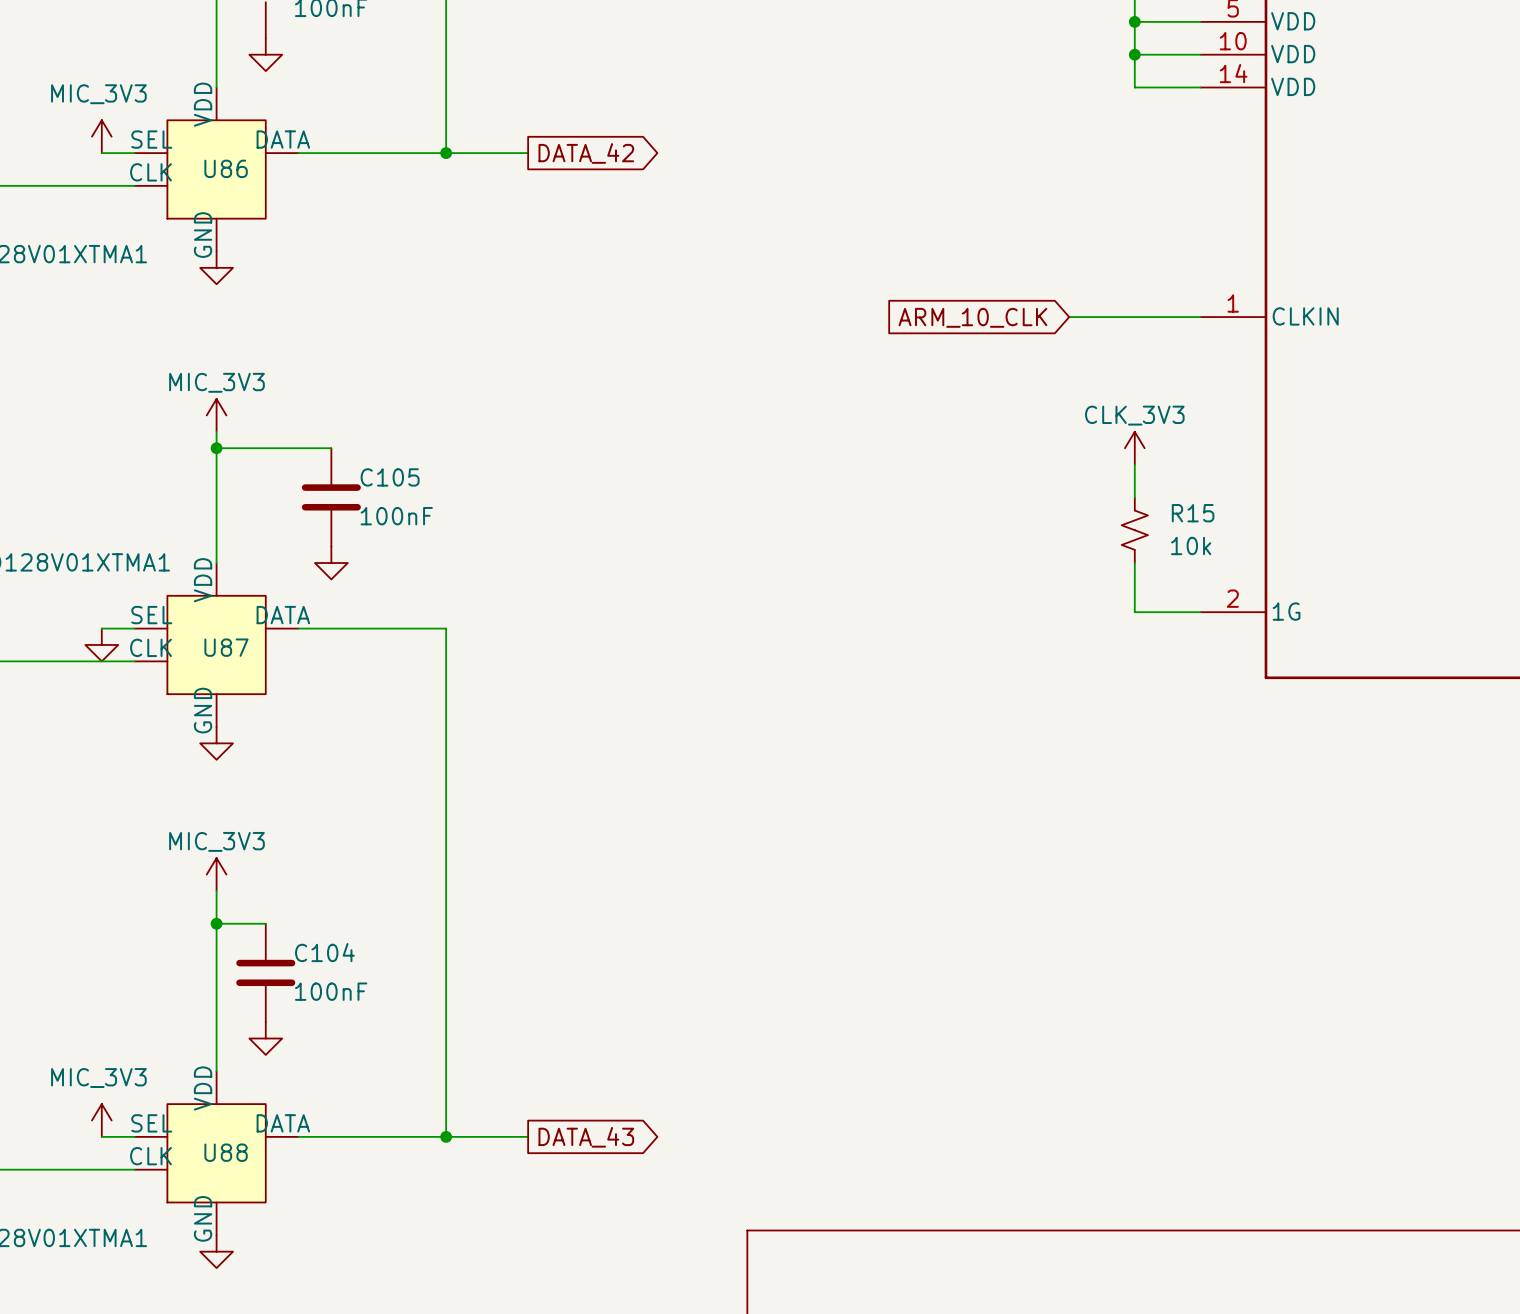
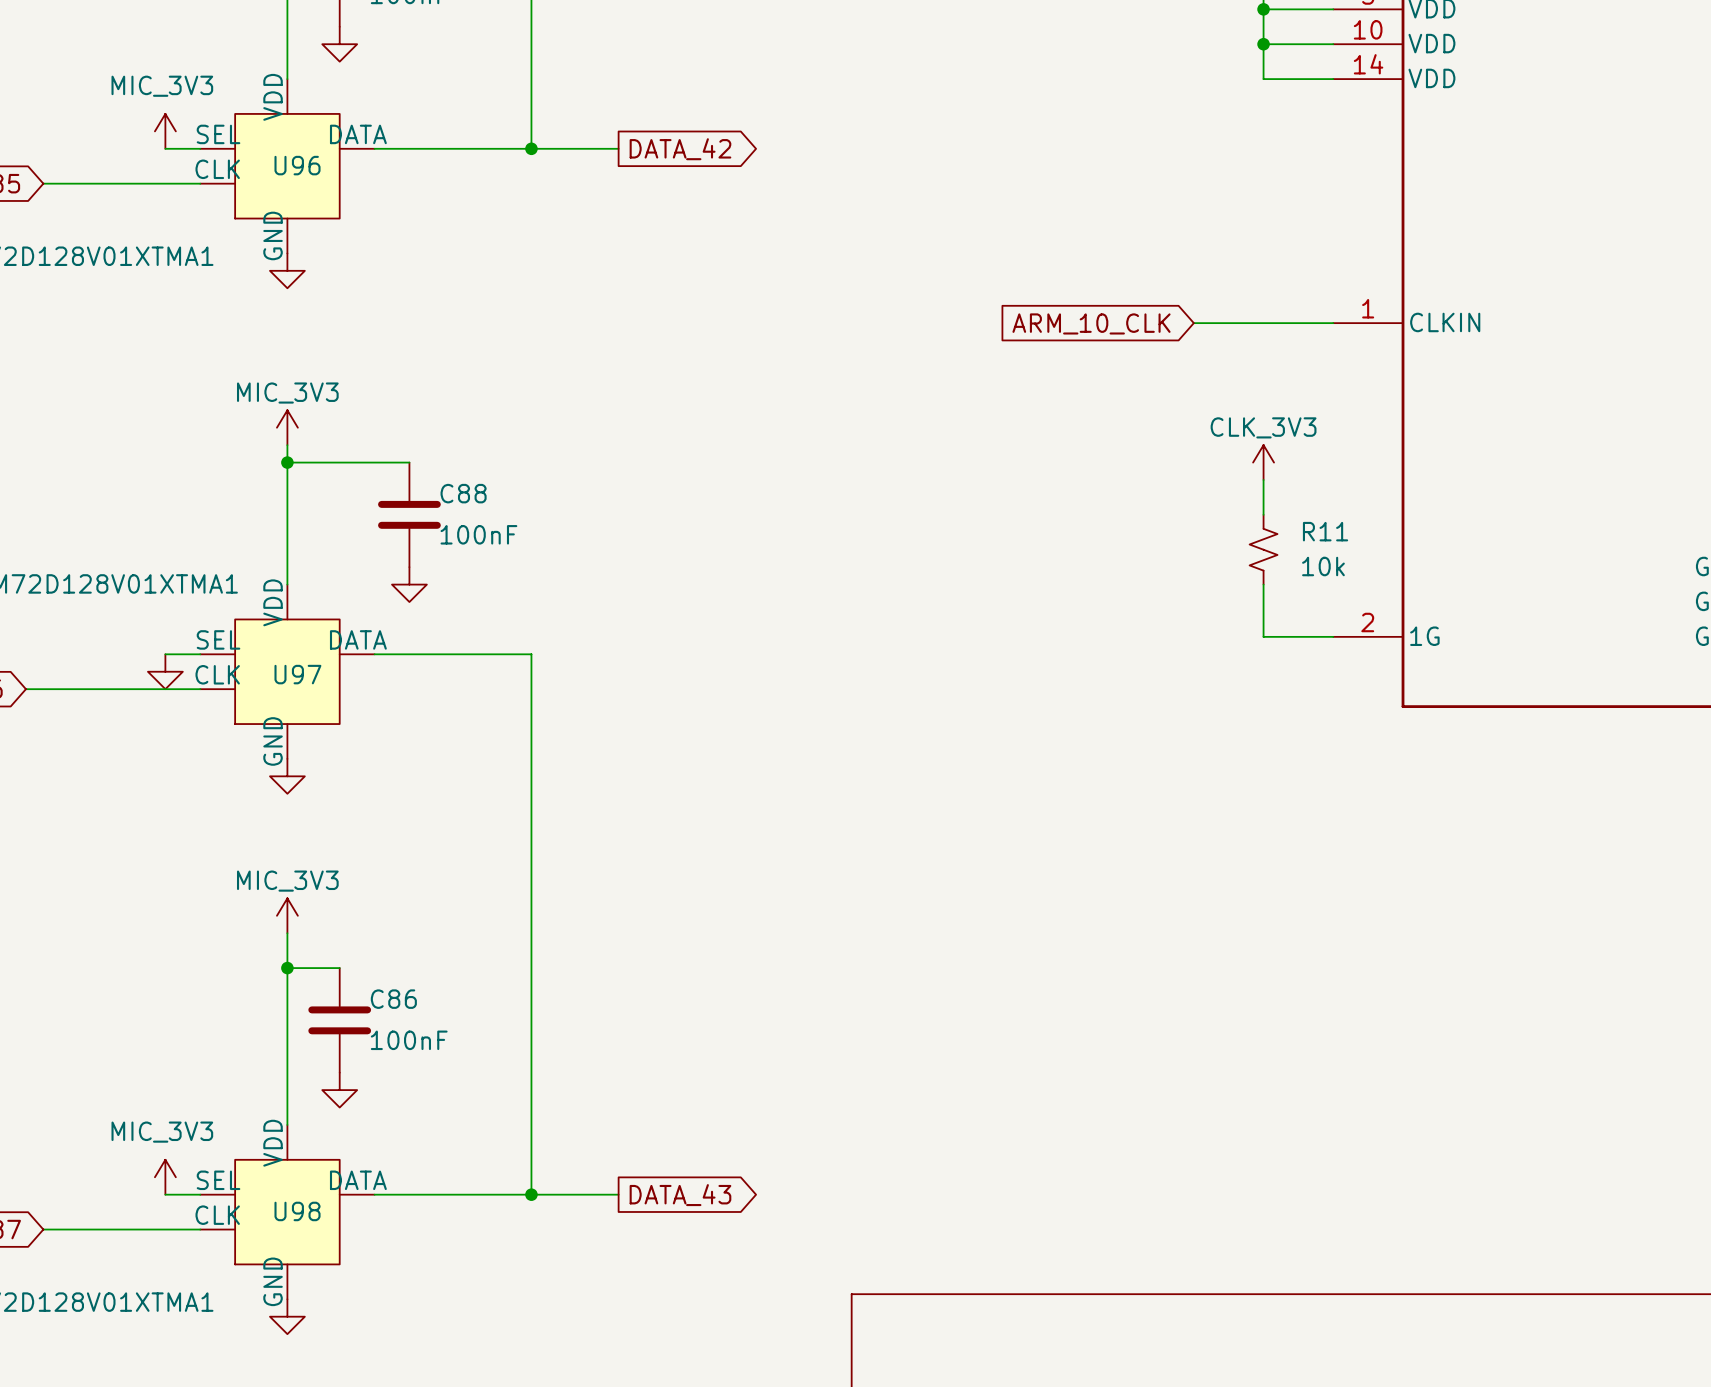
U86 name: U86 (226, 168) -> U96 (297, 165)
C105 name: C105 (390, 477) -> C88 (463, 493)
R15 name: R15 (1193, 513) -> R11 (1325, 531)
U87 name: U87 (226, 647) -> U97 (297, 674)
C104 name: C104 (324, 952) -> C86 (393, 999)
U88 name: U88 (226, 1152) -> U98 (297, 1211)

